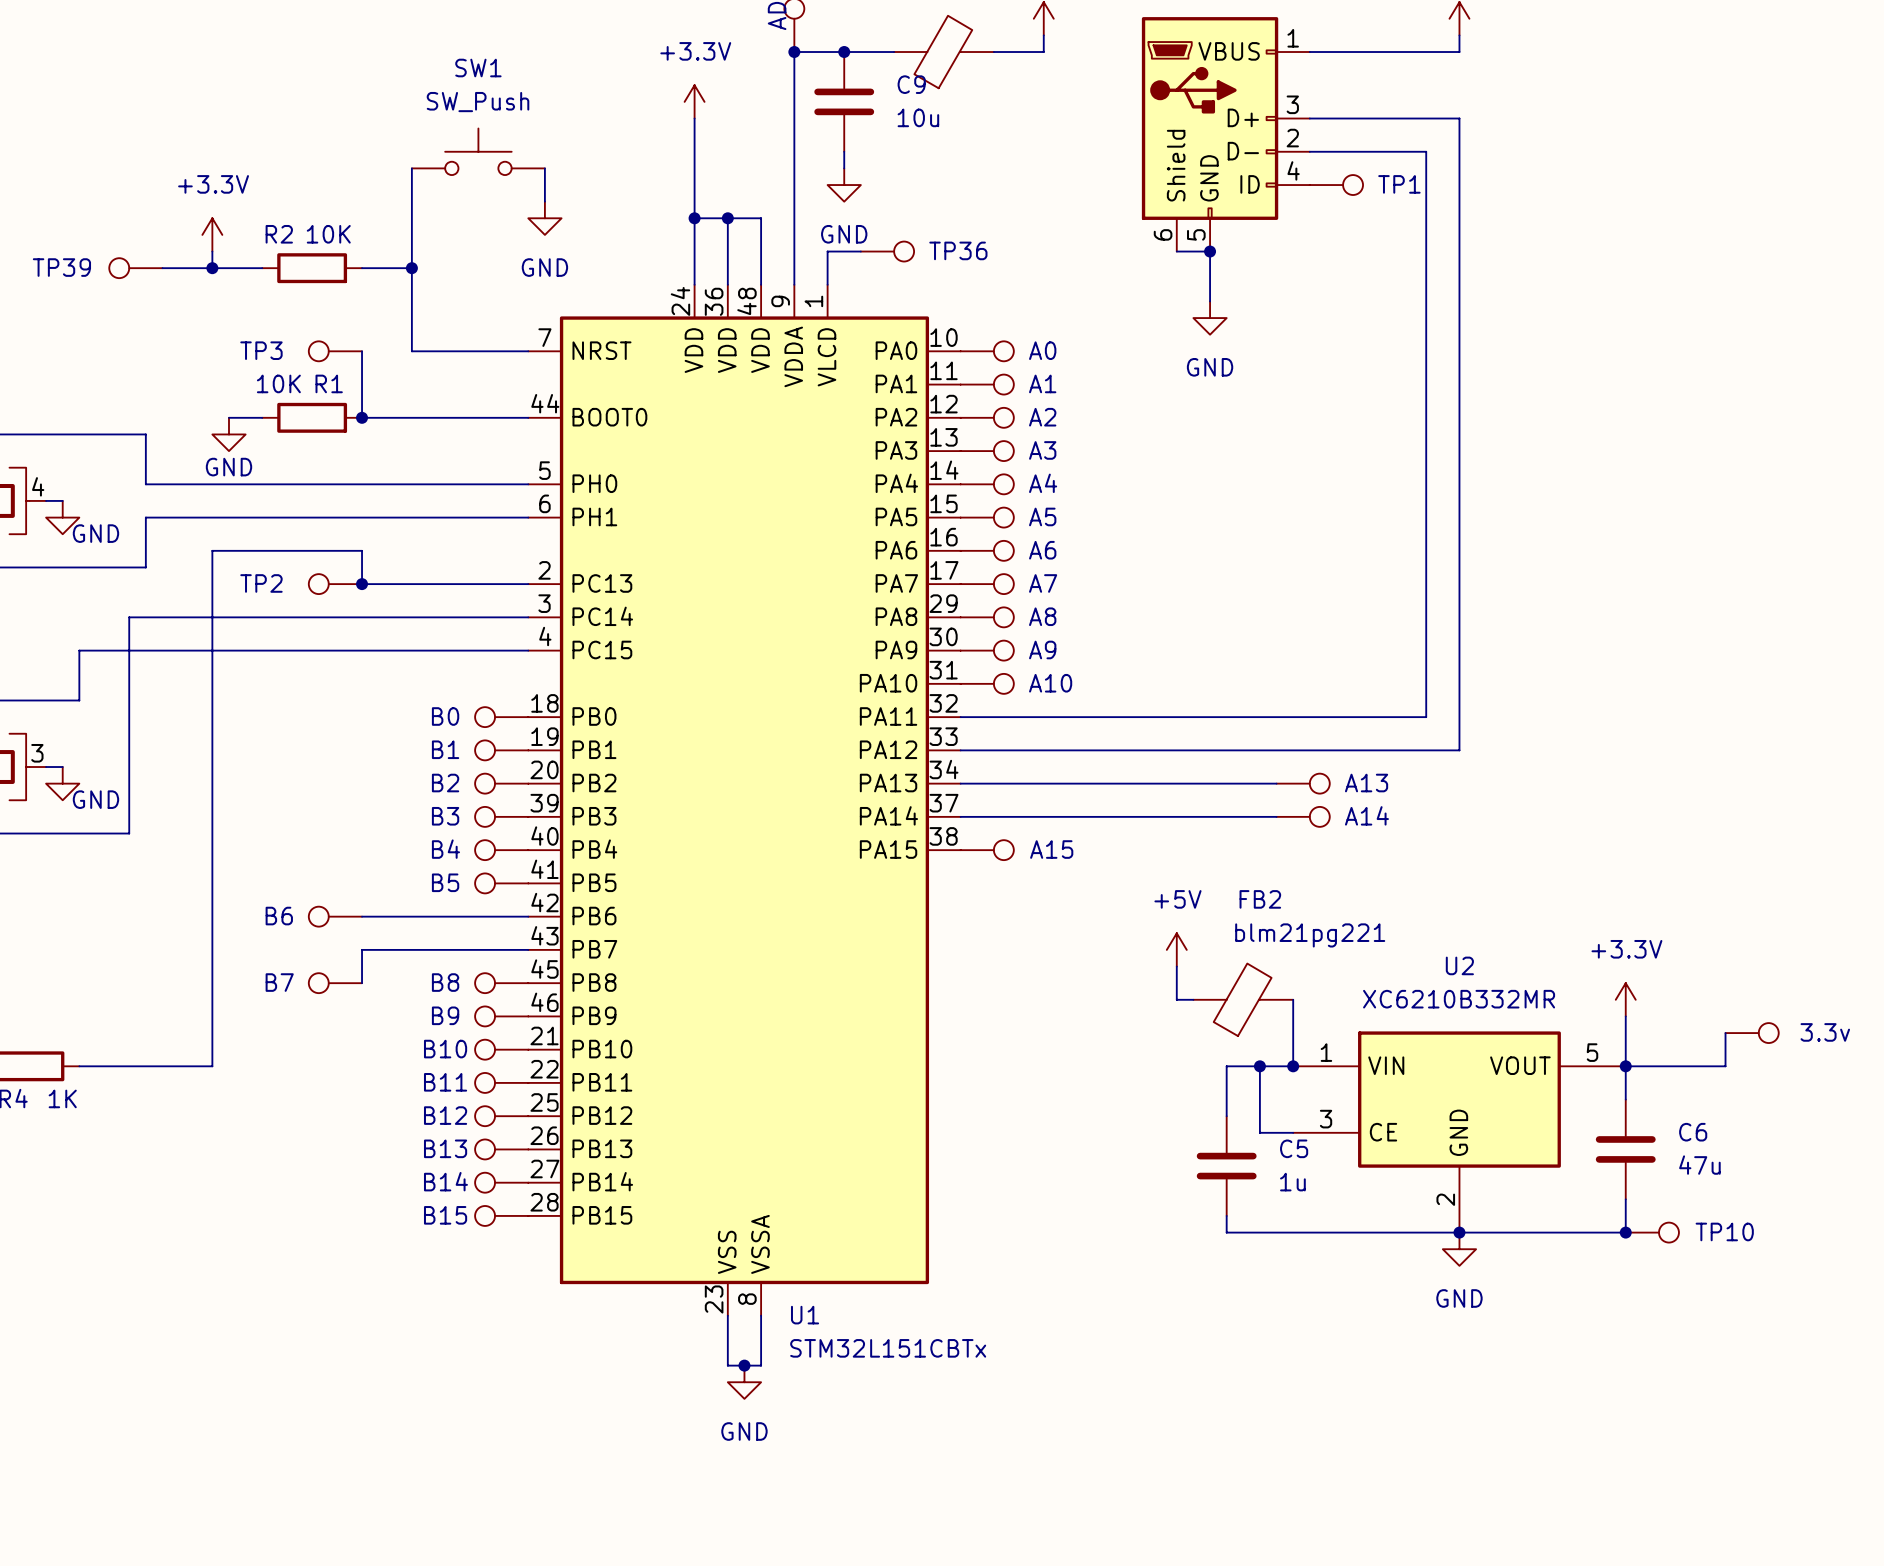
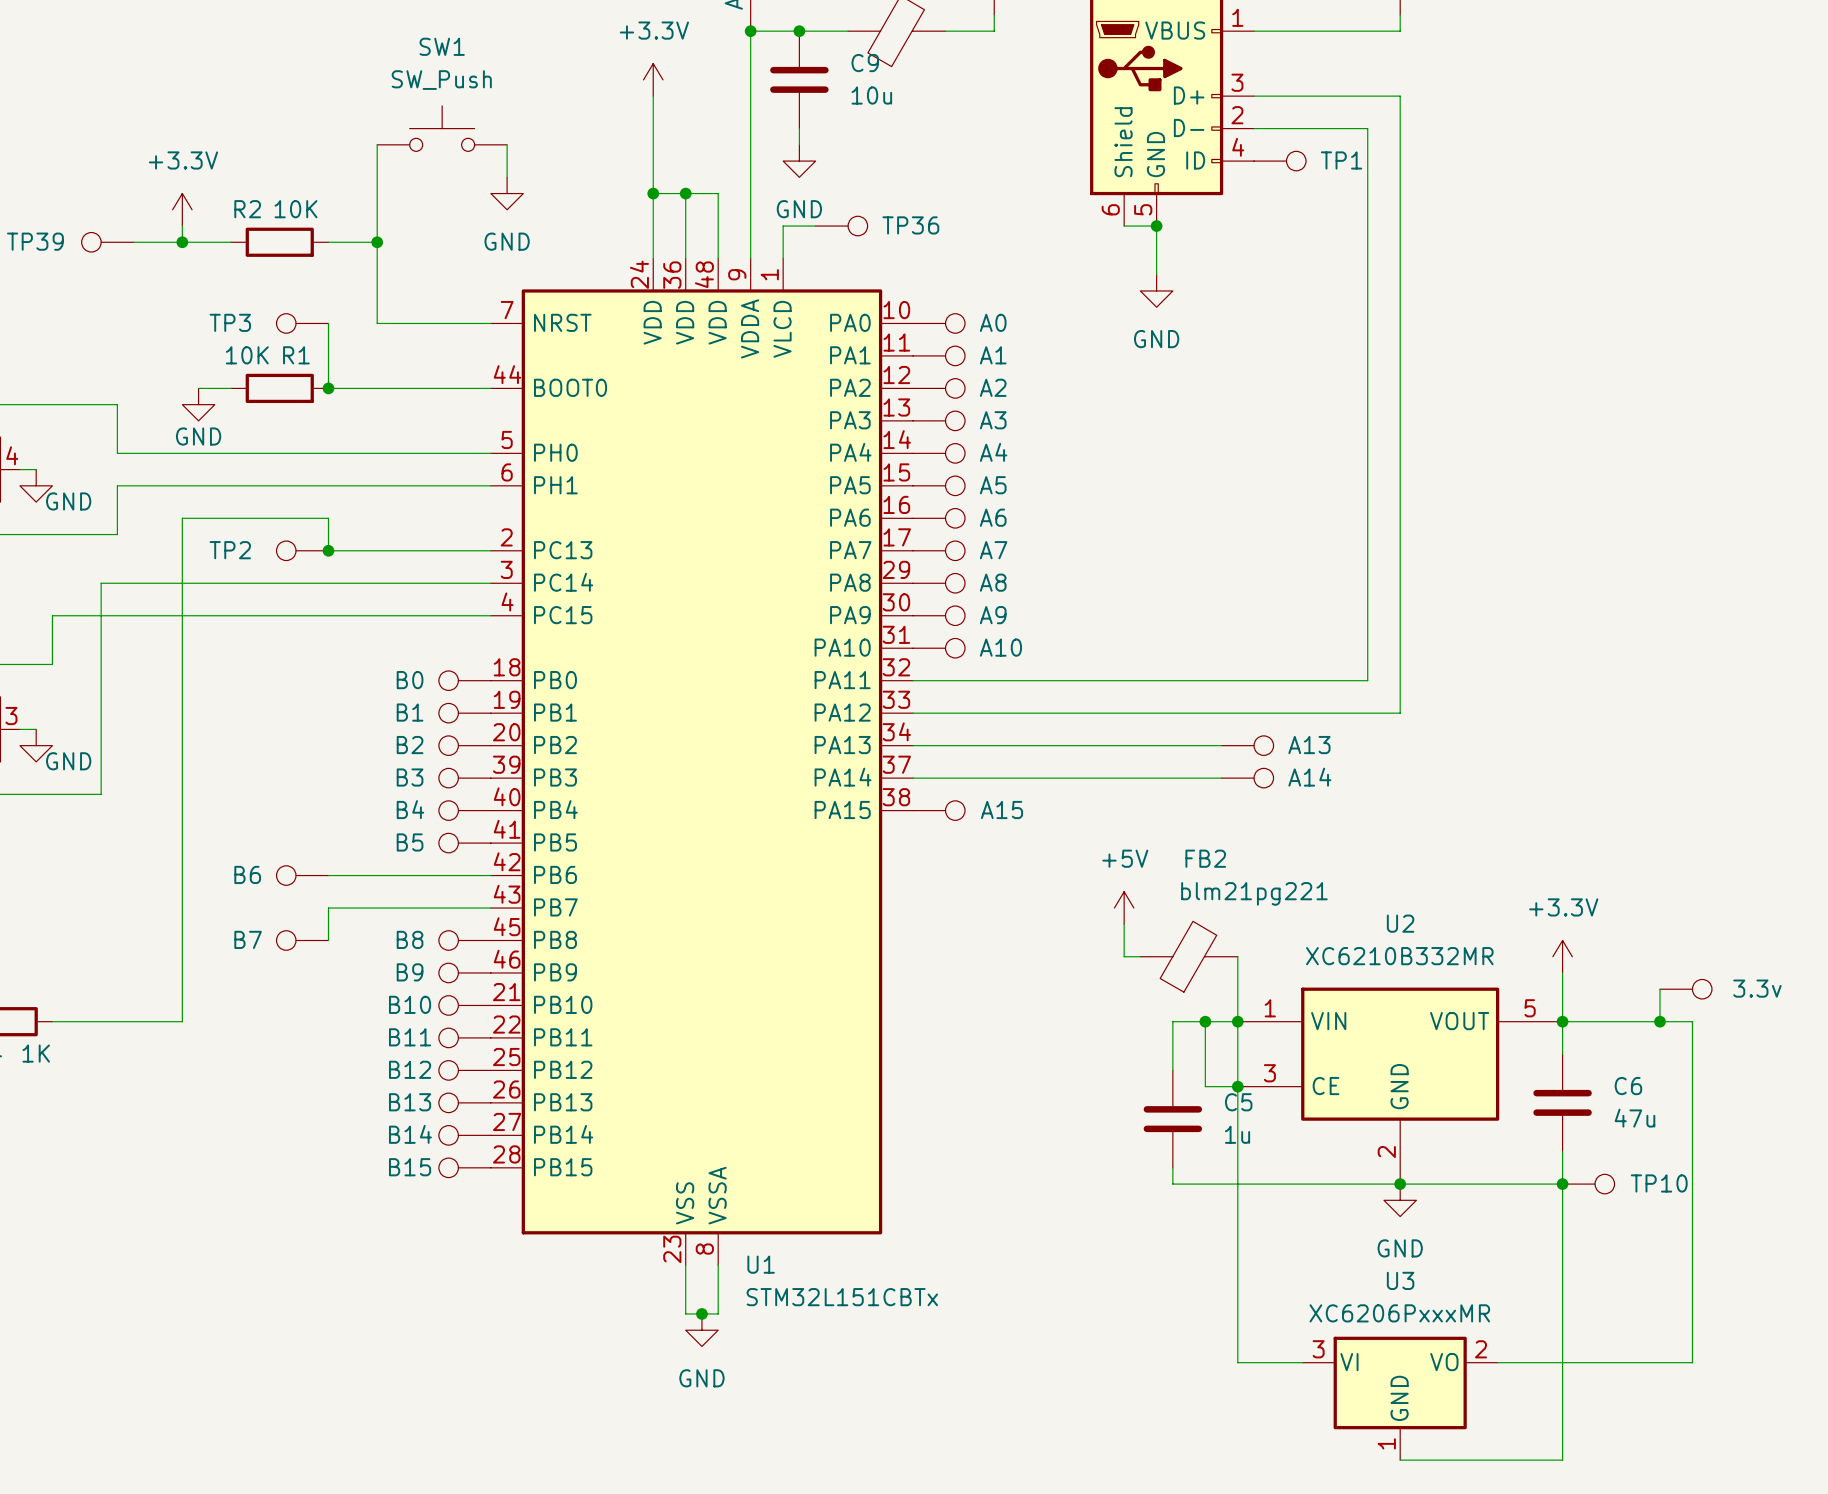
wire: none -> (1237, 1021) (1237, 1362) (1302, 1362)
wire: none -> (1660, 1021) (1692, 1021) (1692, 1362) (1497, 1362)
junction: none -> (1660, 1021)
junction: none -> (1237, 1086)
wire: none -> (1562, 1184) (1562, 1460) (1400, 1460)
U3: none -> XC6206PxxxMR (1400, 1398)

